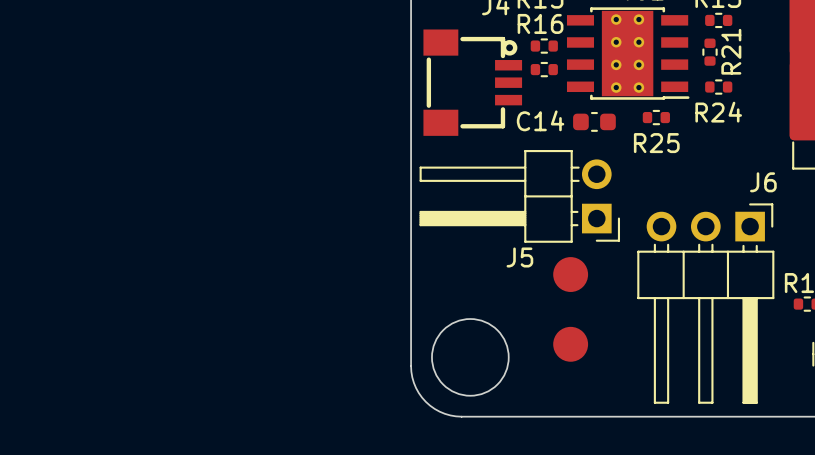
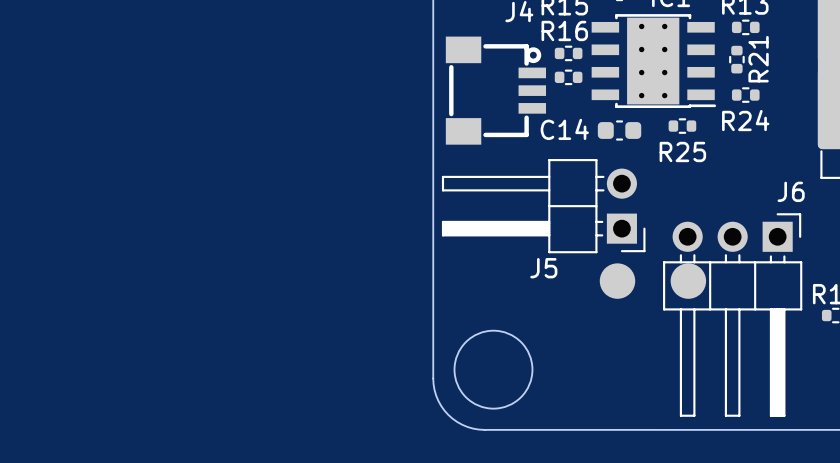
part rotation: 0° (570, 309) -> 90° clockwise (652, 281)
part position: (570, 309) -> (652, 281)

